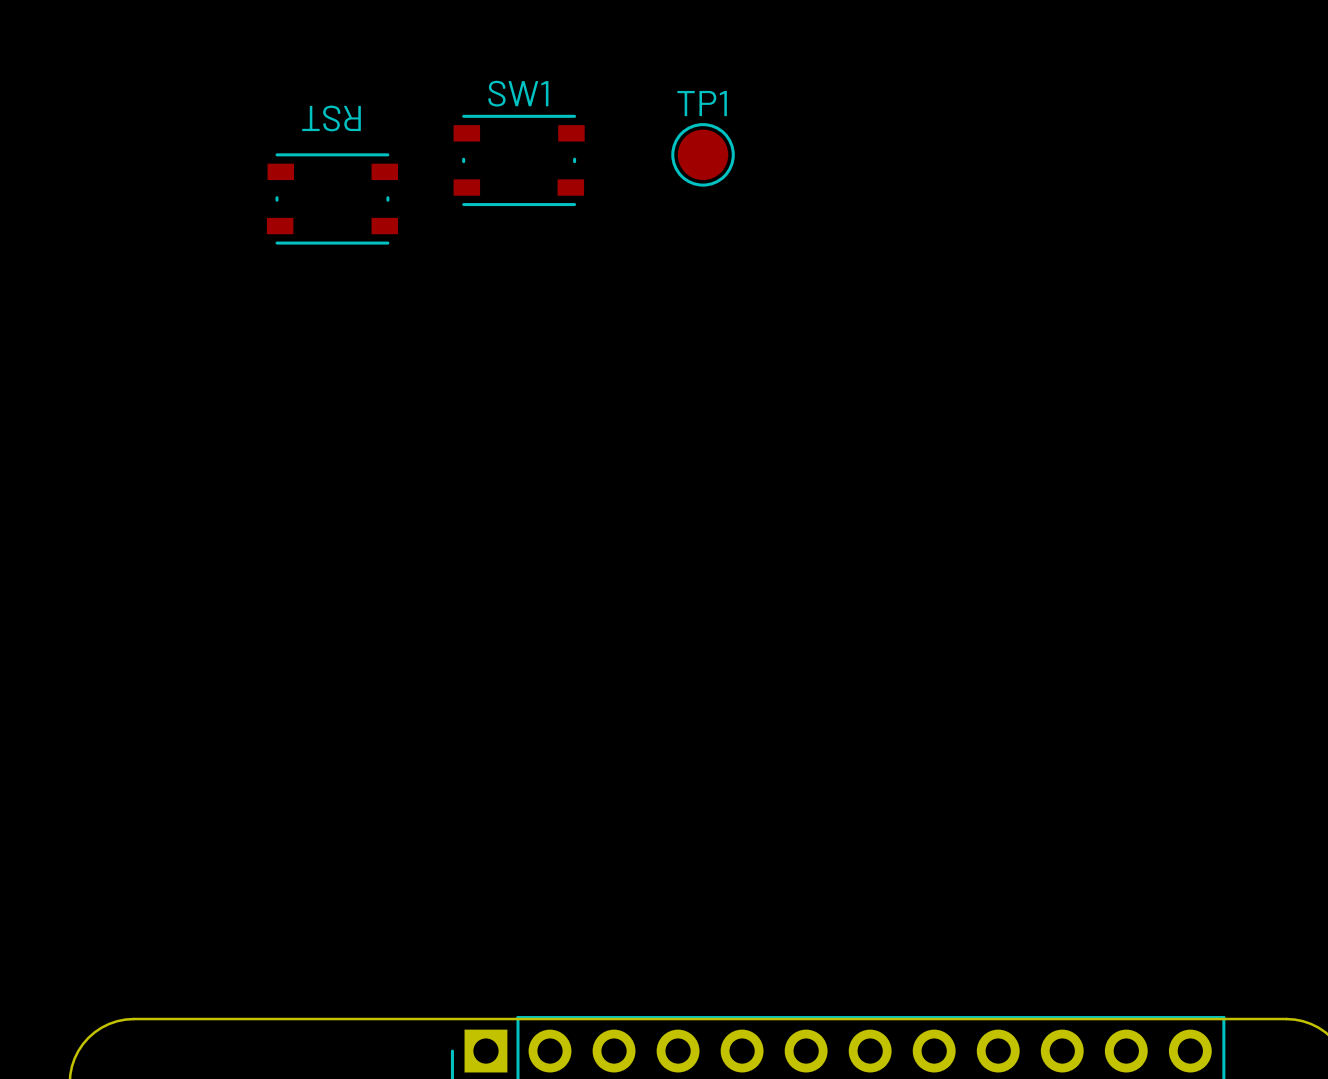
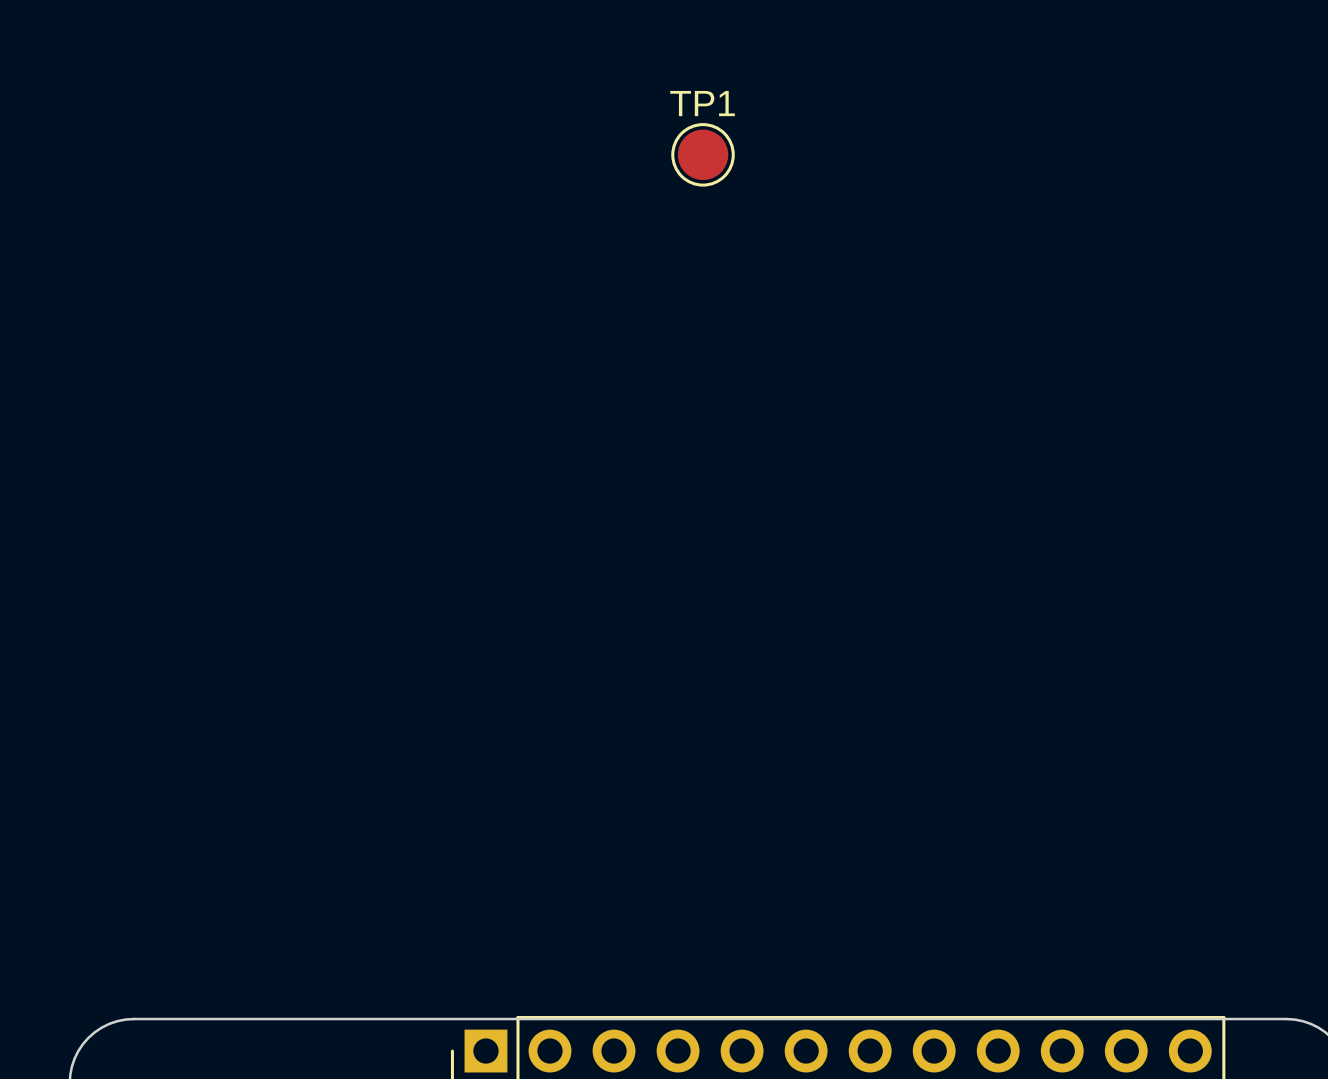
SW1: (519, 160) -> none
part: RST (332, 198) -> none

